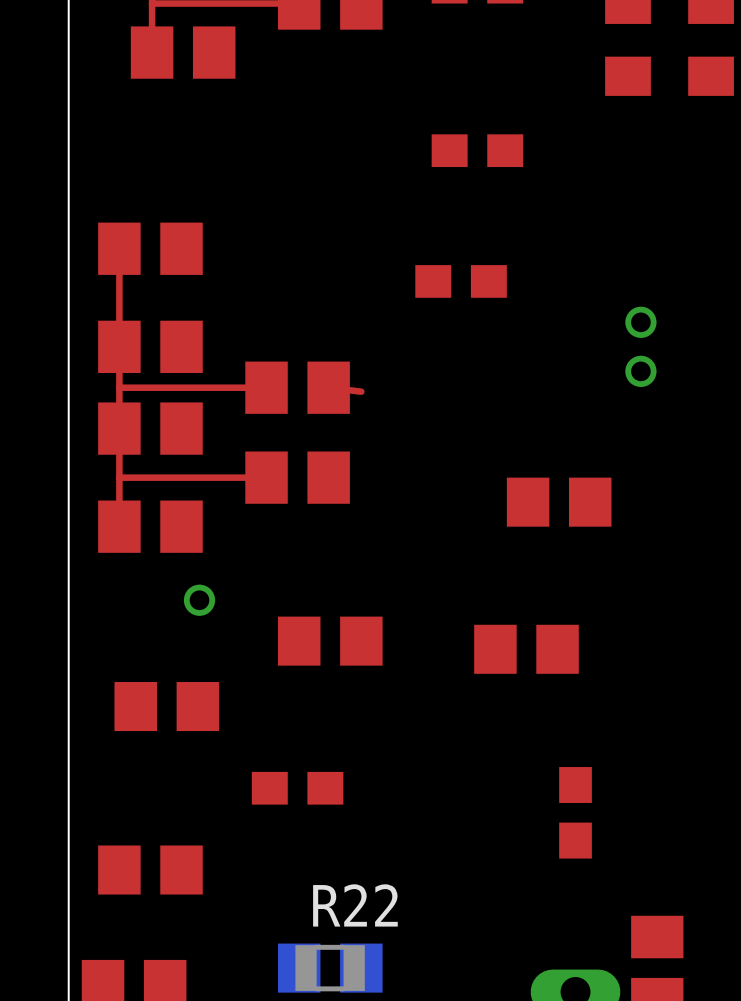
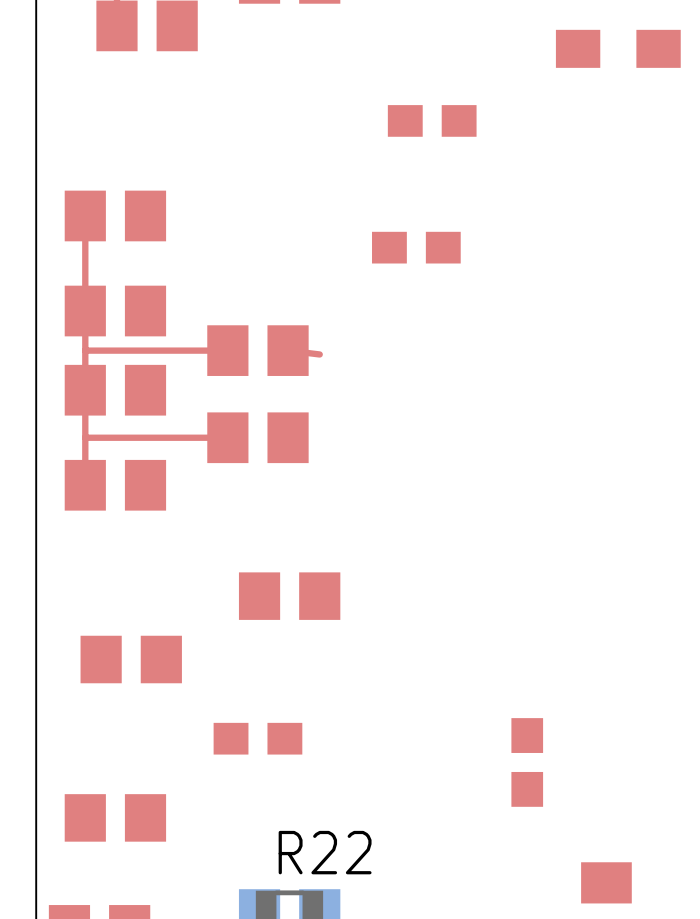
via: (640, 322) -> none
via: (640, 371) -> none
part: (559, 502) -> none
via: (199, 600) -> none
part: (526, 649) -> none

